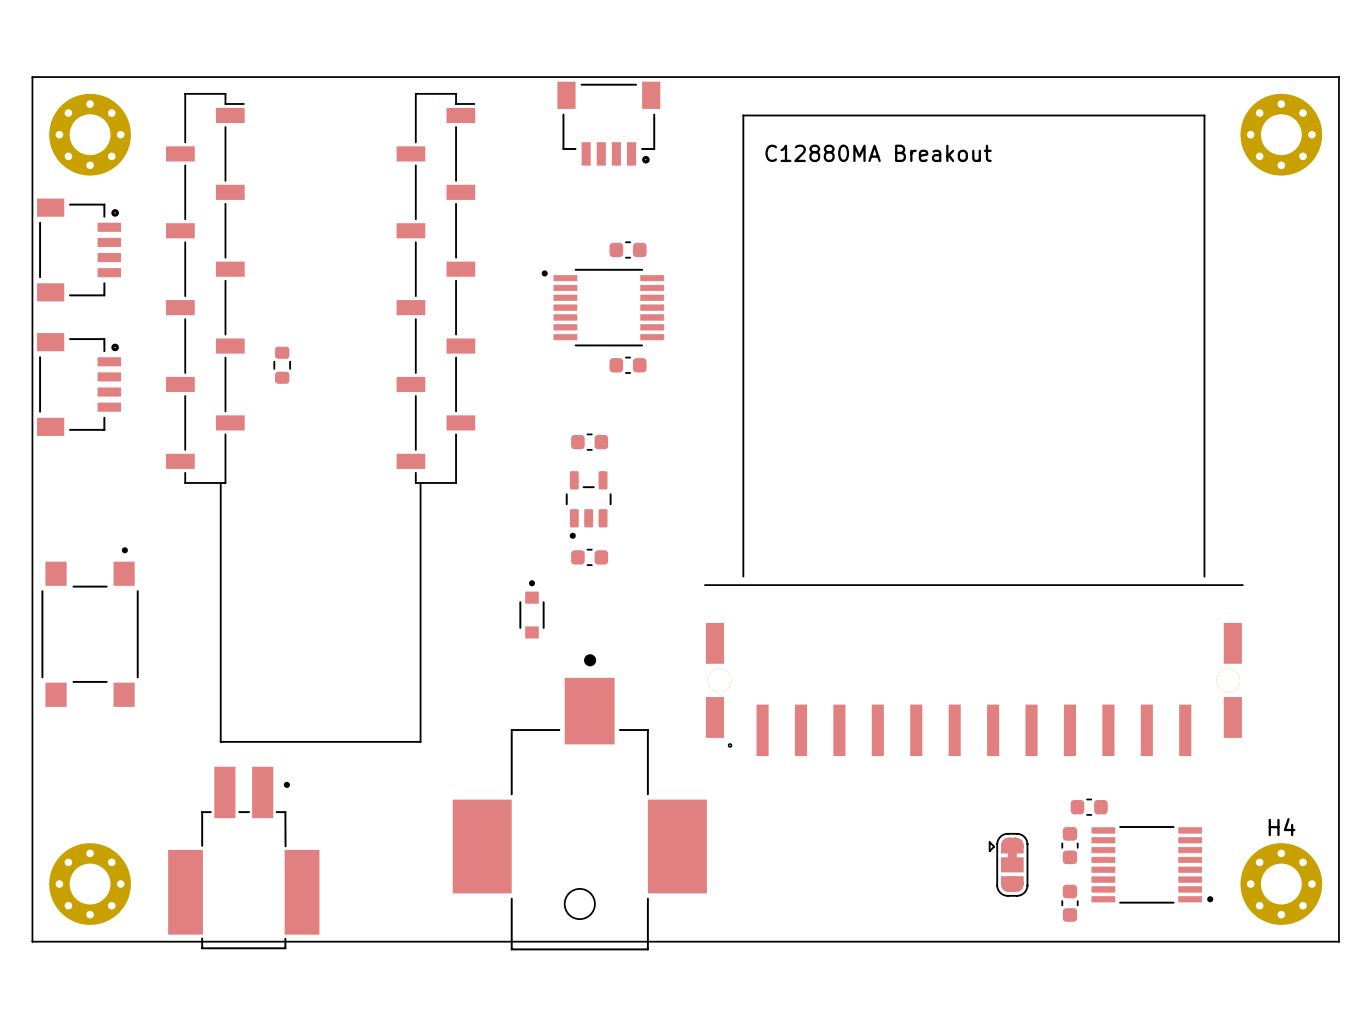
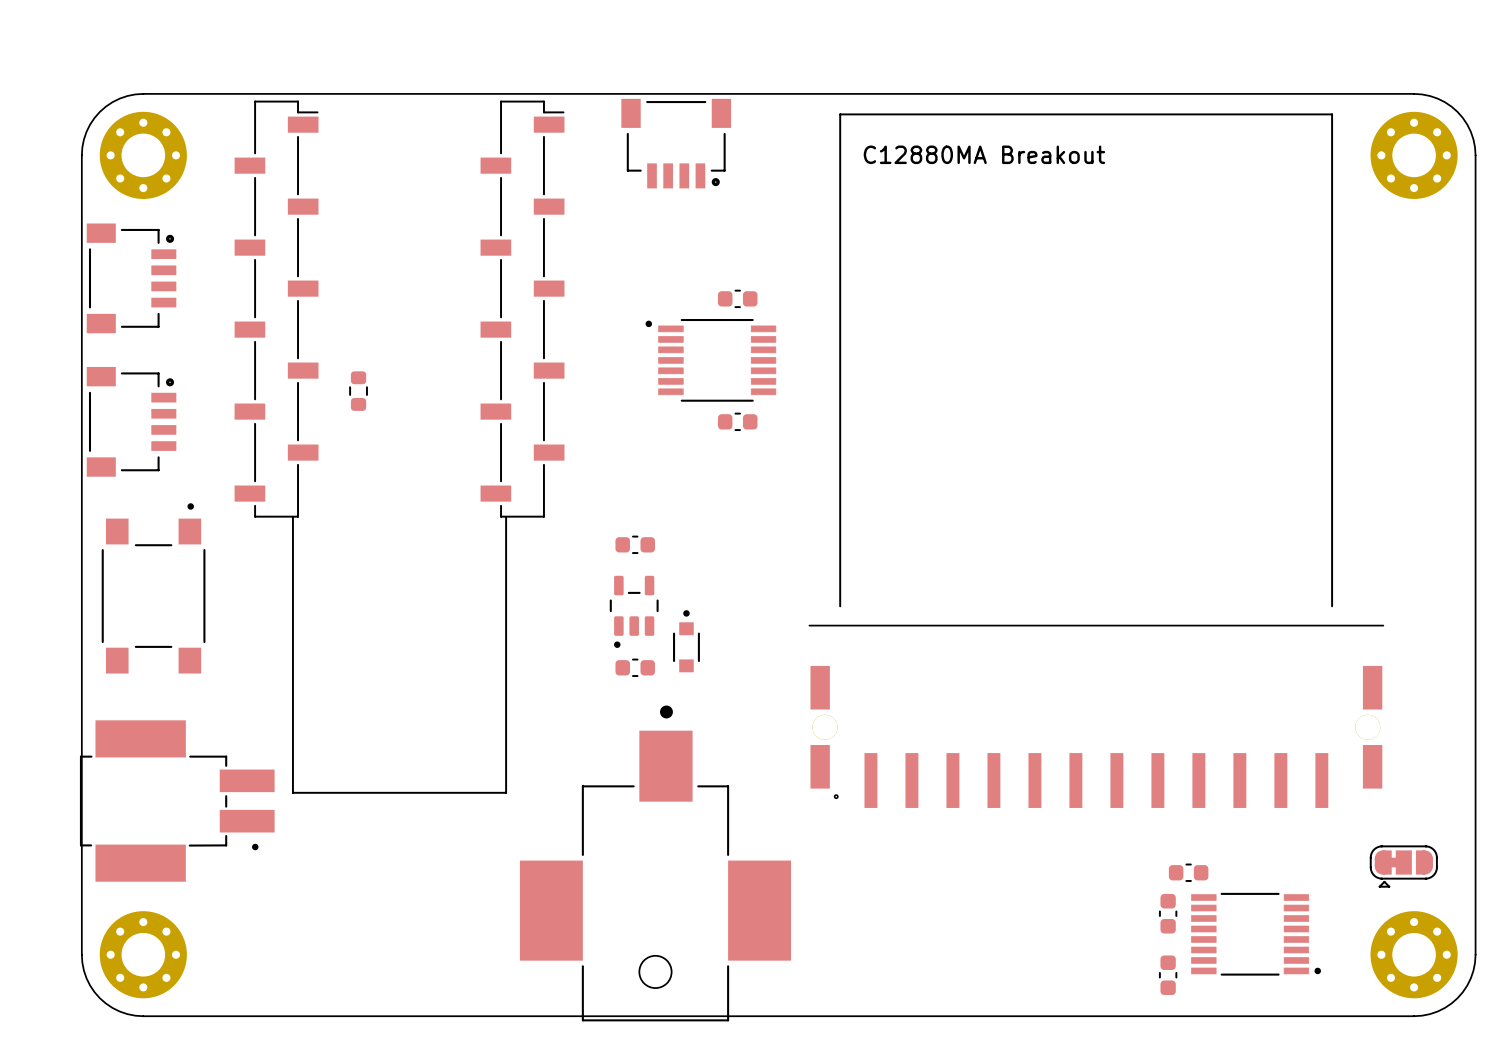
board edge: (32, 77) (32, 941) (1338, 941) (1338, 77) (32, 77) -> (81, 155) (86, 131) (99, 111) (119, 98) (143, 93) (1414, 93) (1429, 96) (1444, 102) (1457, 111) (1467, 124) (1473, 139) (1475, 155) (1475, 954) (1473, 970) (1467, 985) (1457, 998) (1444, 1007) (1429, 1014) (1414, 1016) (143, 1016) (127, 1014) (112, 1007) (99, 998) (90, 985) (83, 970) (81, 954) (81, 155)
part position: (608, 123) -> (676, 143)
part position: (90, 134) -> (143, 155)
part position: (1281, 134) -> (1414, 155)
text position: C12880MA Breakout (878, 153) -> C12880MA Breakout (984, 154)
part position: (79, 249) -> (131, 278)
part position: (628, 249) -> (737, 298)
part position: (602, 307) -> (710, 360)
part position: (628, 365) -> (737, 421)
part position: (79, 384) -> (131, 421)
part: (589, 442) -> none
part position: (588, 504) -> (634, 611)
part: none -> (635, 544)
part: (589, 557) -> none
line: (743, 576) (743, 115) (1204, 115) (1204, 576) -> (840, 606) (840, 114) (1332, 114) (1332, 606)
part position: (531, 609) -> (686, 641)
part: none -> (635, 667)
part position: (90, 627) -> (153, 588)
part position: (579, 802) -> (655, 863)
part: (1089, 807) -> none
part: none -> (1188, 872)
H4 name: H4 (1282, 827) -> none
part: (1069, 845) -> none
part: none -> (1168, 913)
part rotation: 0° (243, 857) -> 90° clockwise (177, 801)
part position: (243, 857) -> (177, 801)
part rotation: 0° (1008, 864) -> 90° counterclockwise (1403, 866)
part position: (1008, 864) -> (1403, 866)
part position: (1152, 864) -> (1256, 934)
part position: (90, 884) -> (143, 954)
H4 position: (1281, 884) -> (1414, 954)
part: (1069, 903) -> none
part: none -> (1168, 975)

